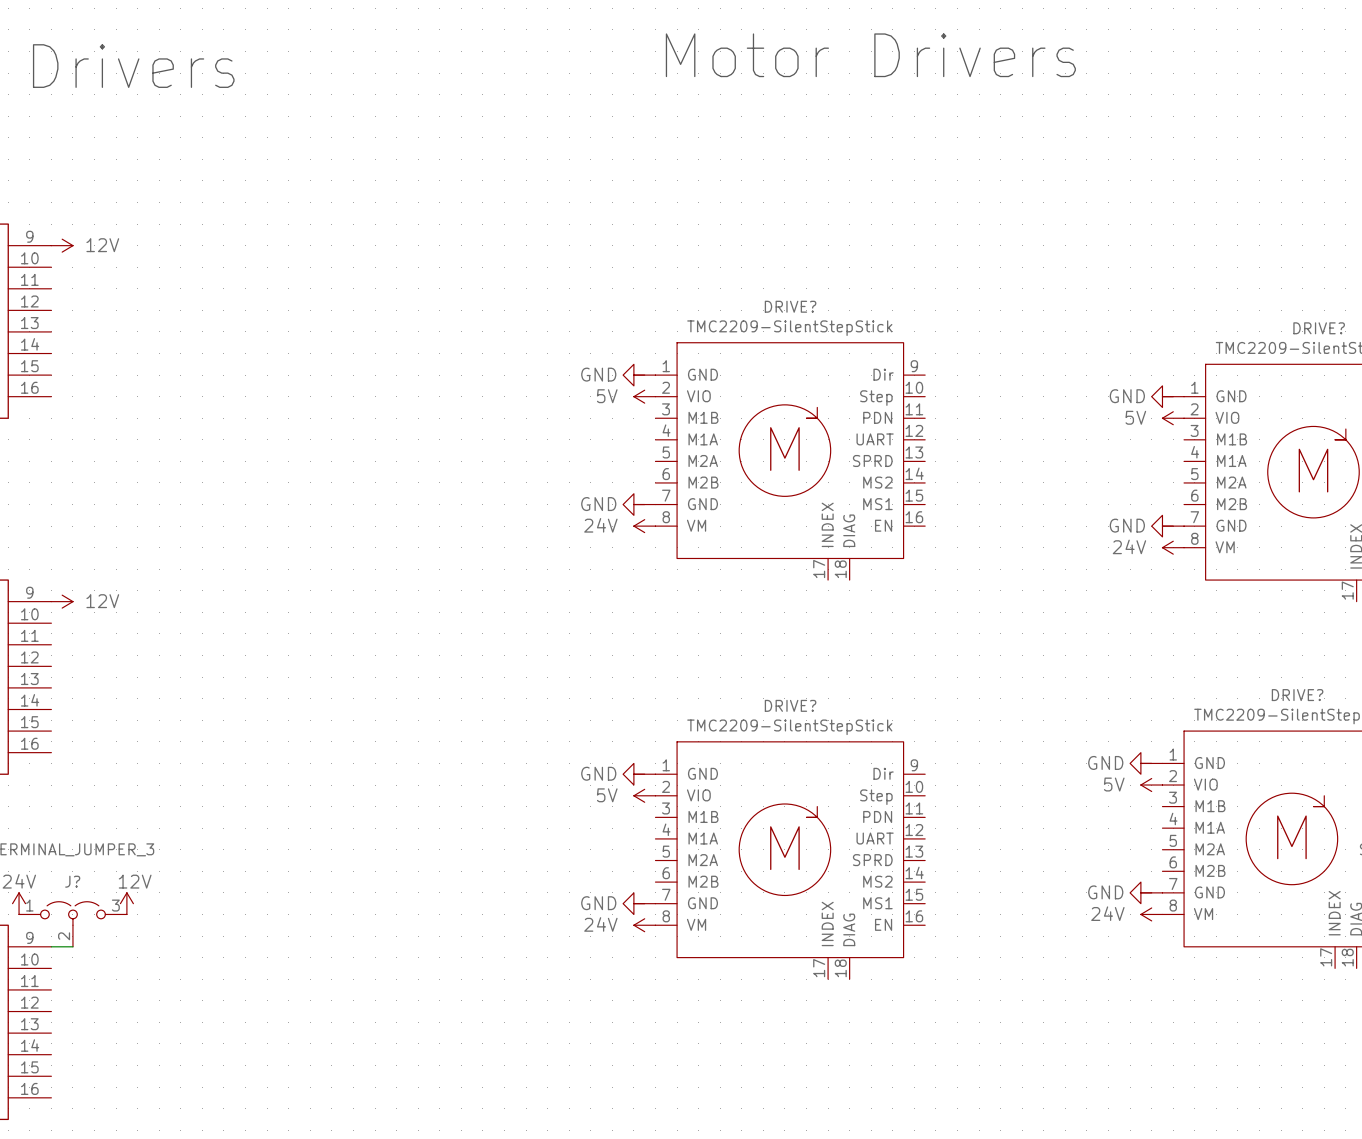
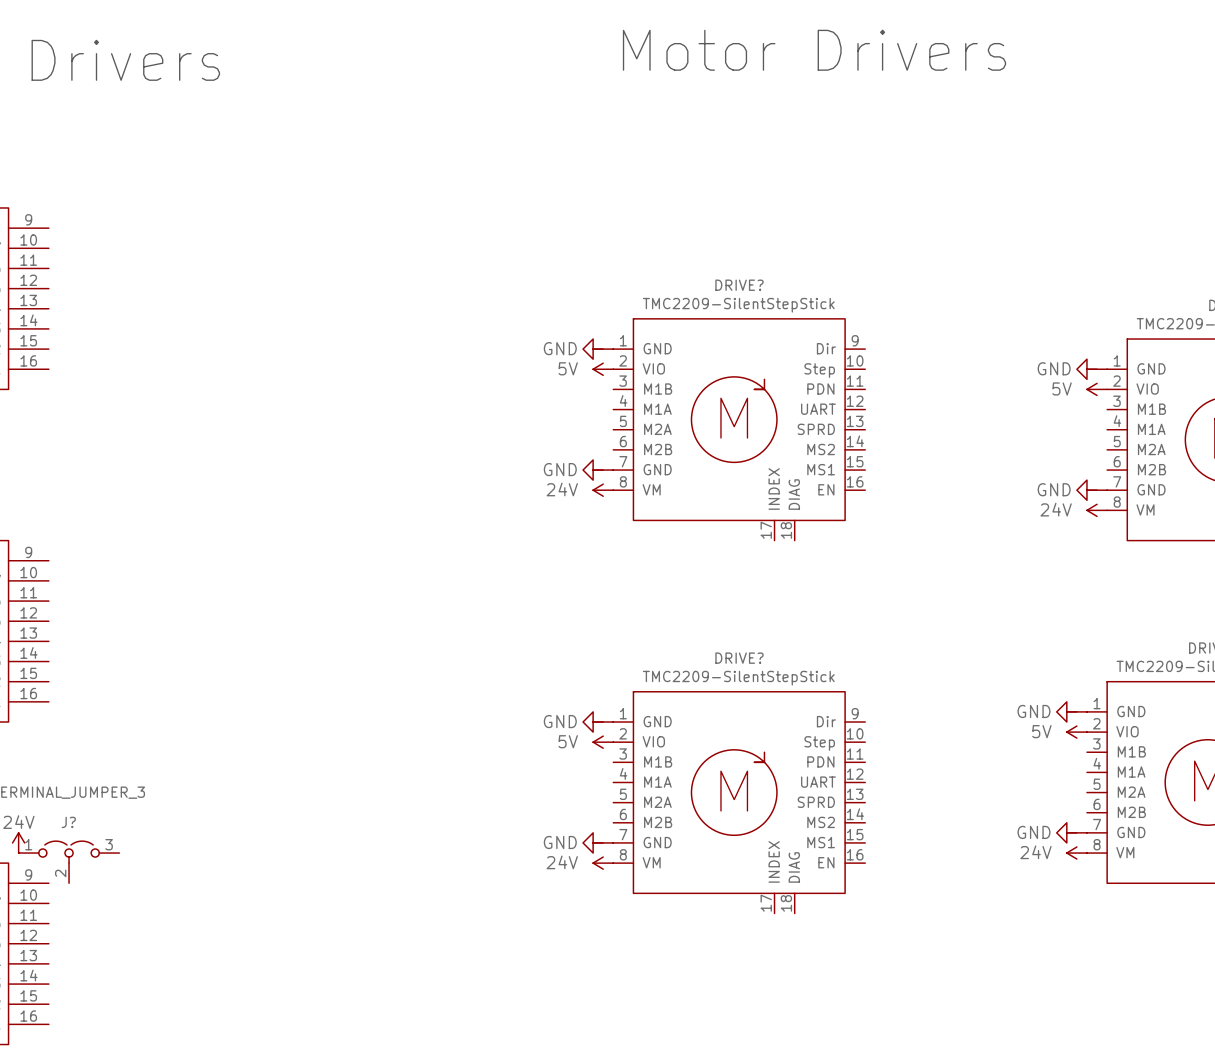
power symbol: 12V (62, 245) -> none
power symbol: 12V (62, 601) -> none
power symbol: 12V (126, 903) -> none
wire: (51, 946) (72, 946) -> none

